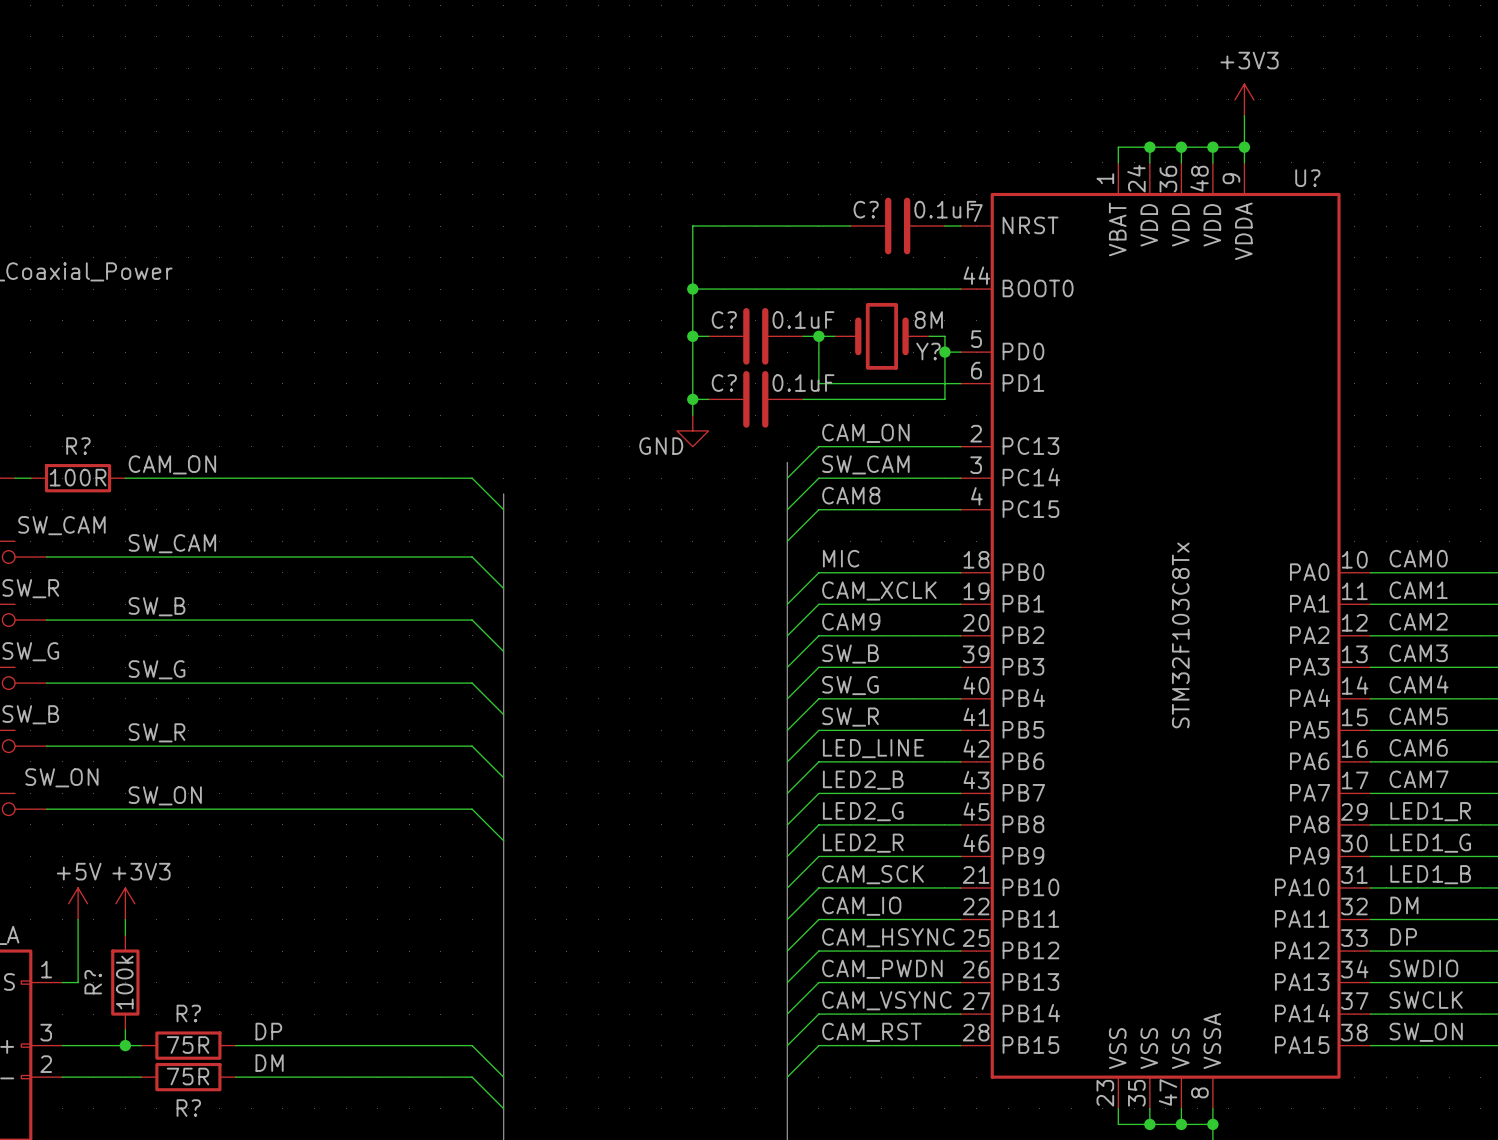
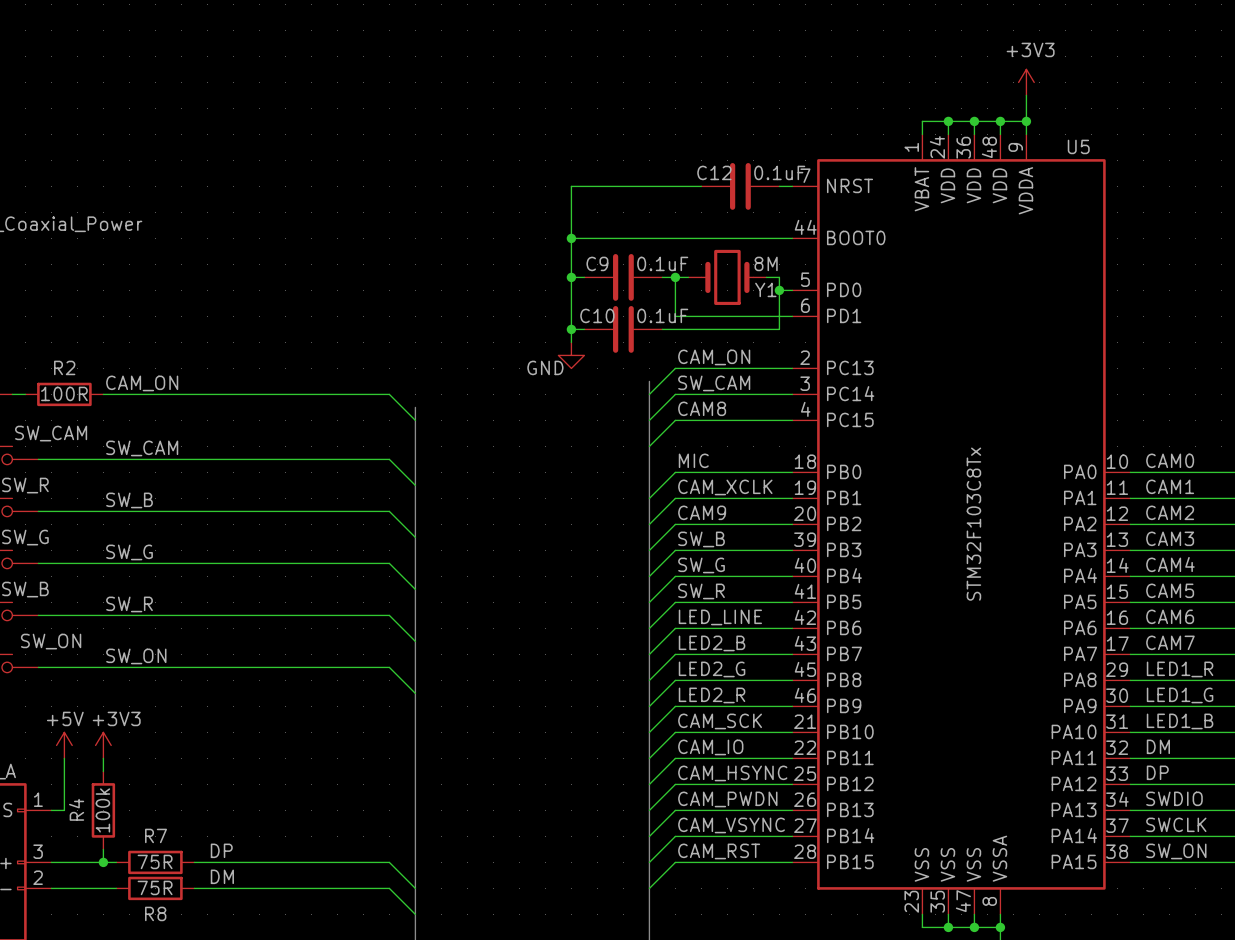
U? name: U? (1307, 178) -> U5 (1078, 146)
C? name: C? (866, 209) -> C12 (714, 172)
C? name: C? (724, 319) -> C9 (597, 263)
Y? name: Y? (928, 351) -> Y1 (765, 289)
C? name: C? (724, 383) -> C10 (597, 315)
R? name: R? (78, 446) -> R2 (64, 367)
R? name: R? (93, 982) -> R4 (76, 809)
R? name: R? (188, 1013) -> R7 (156, 835)
R? name: R? (188, 1108) -> R8 (155, 913)

